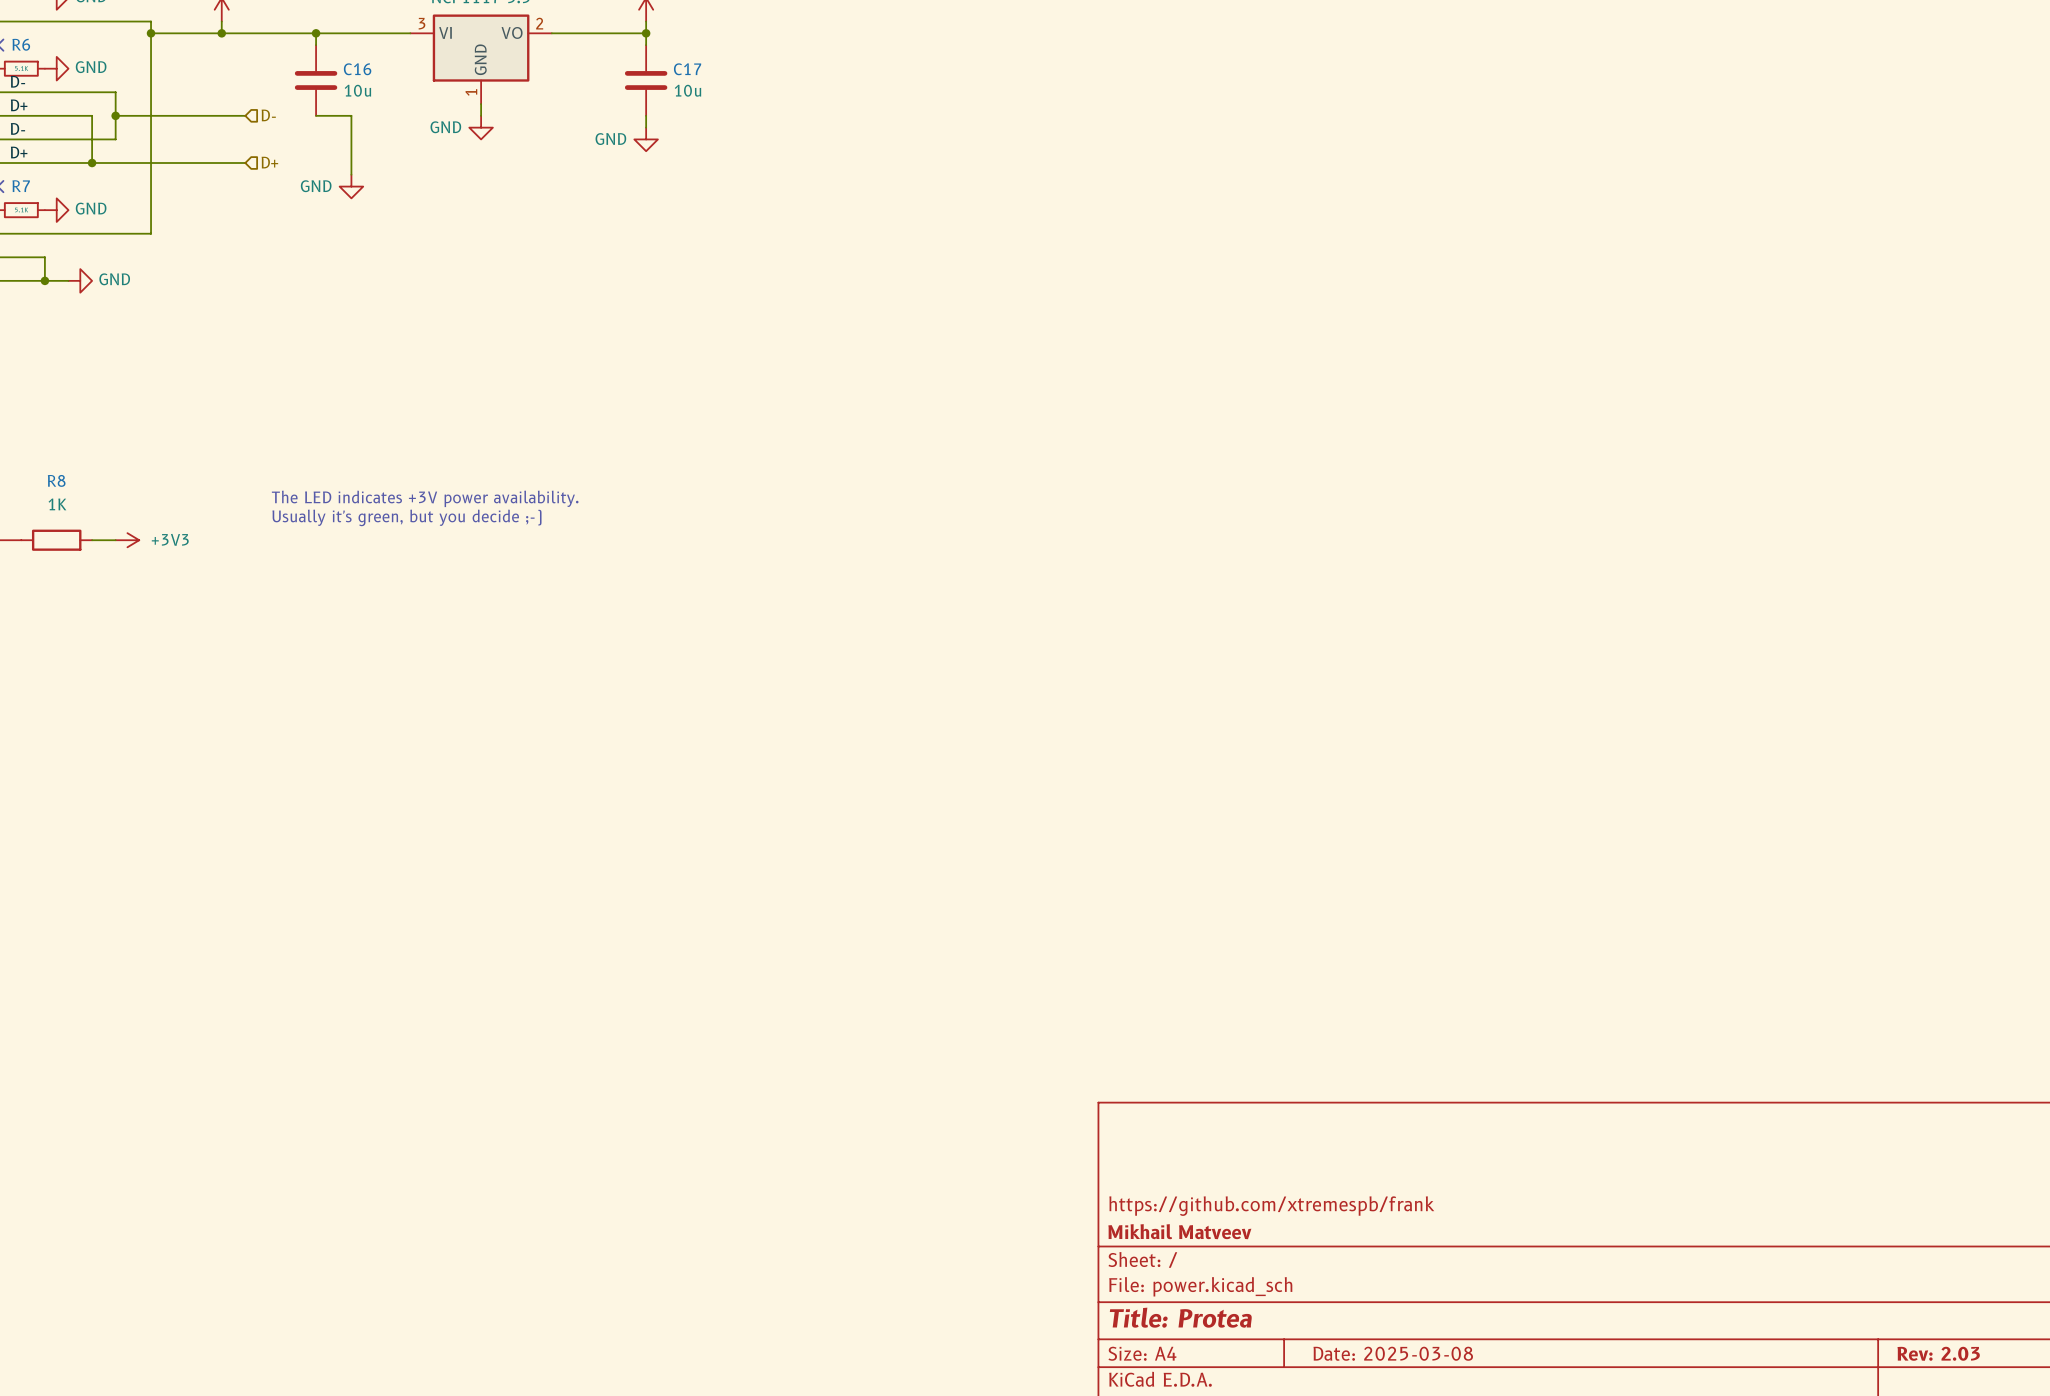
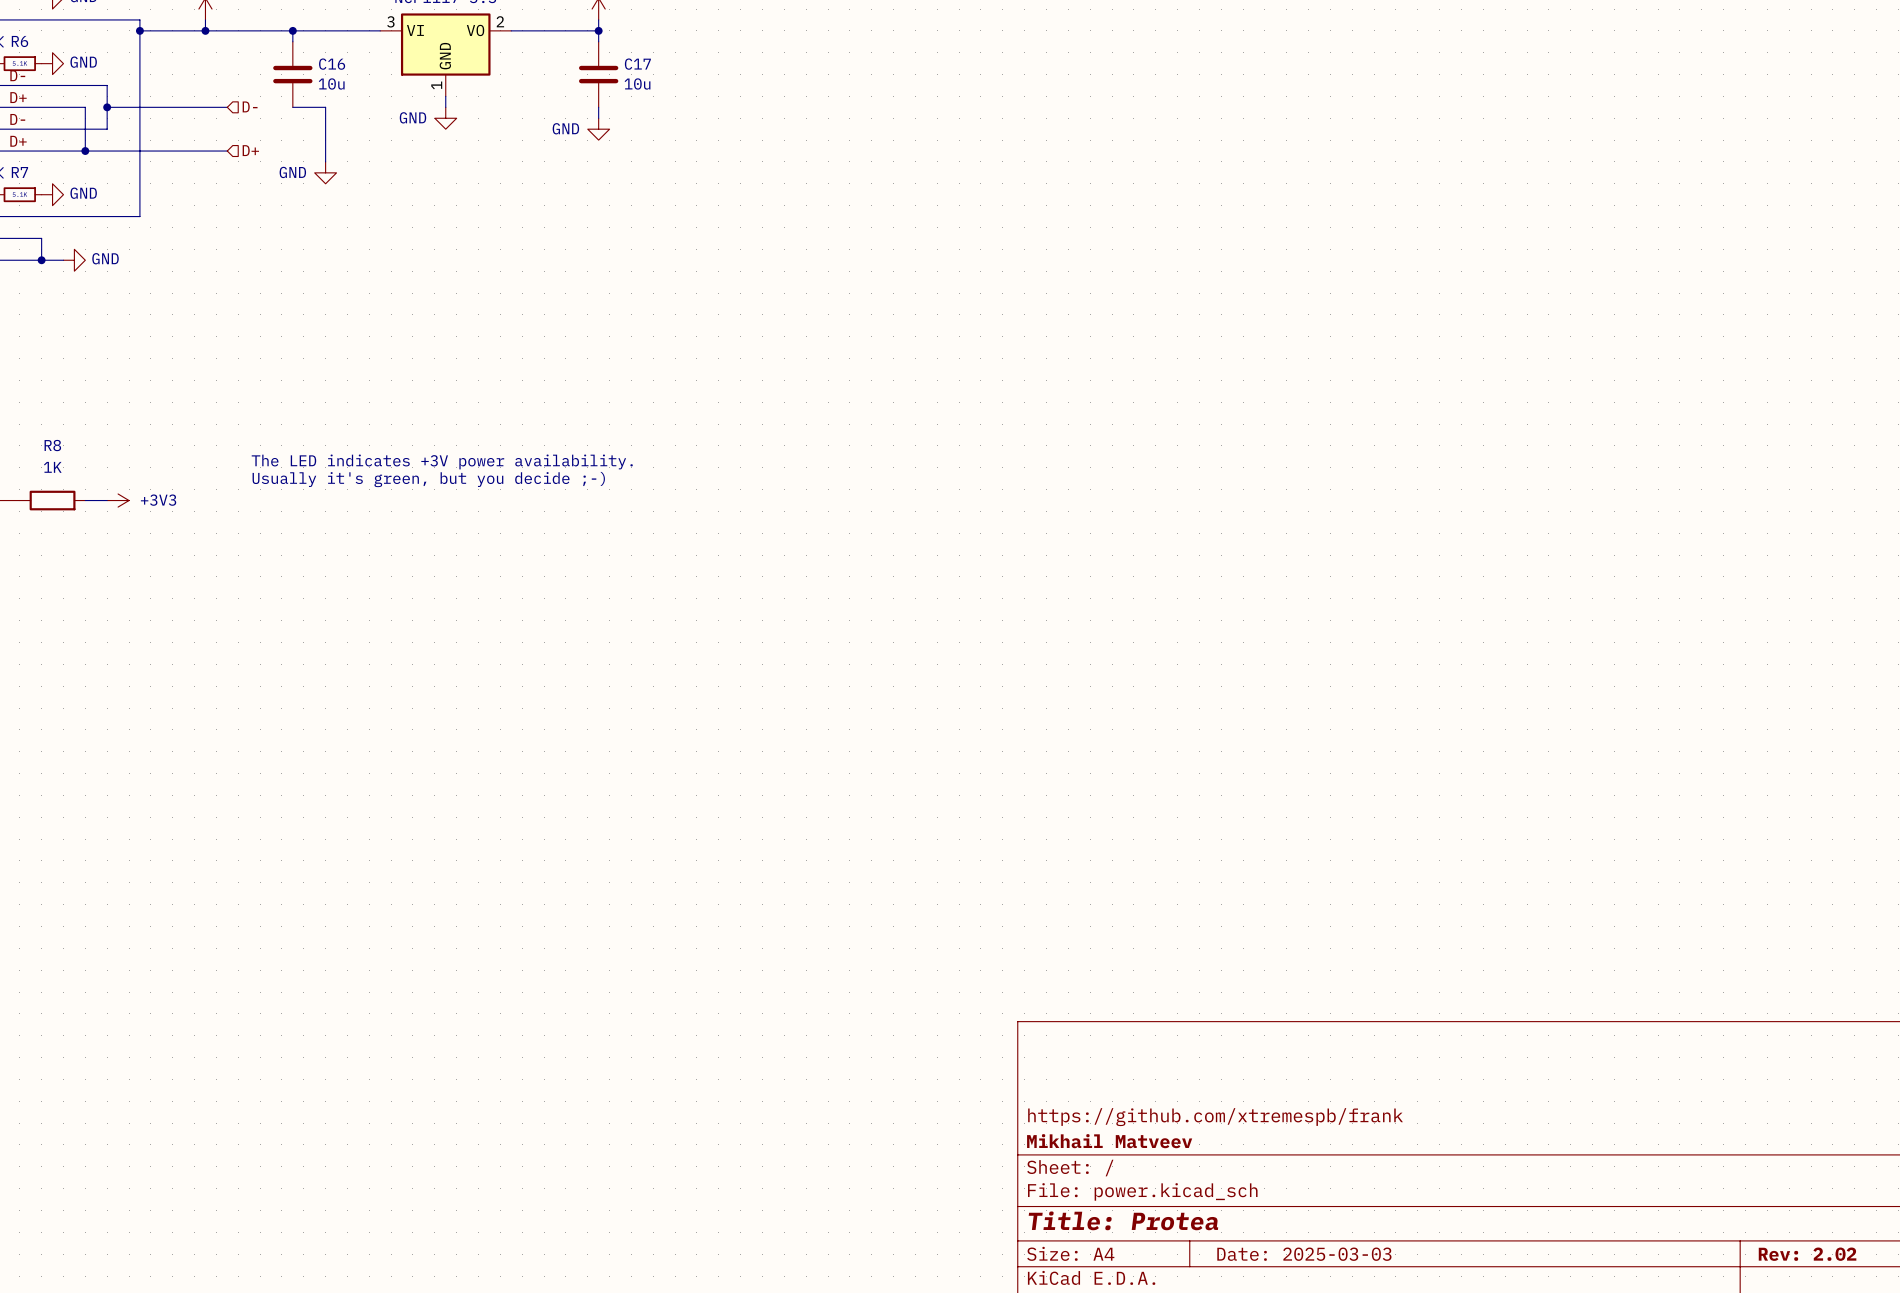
title block: Date: 2025-03-08 (1393, 1353) -> Date: 2025-03-03 (1304, 1254)
title block: Rev: 2.03 (1938, 1353) -> Rev: 2.02 (1807, 1254)

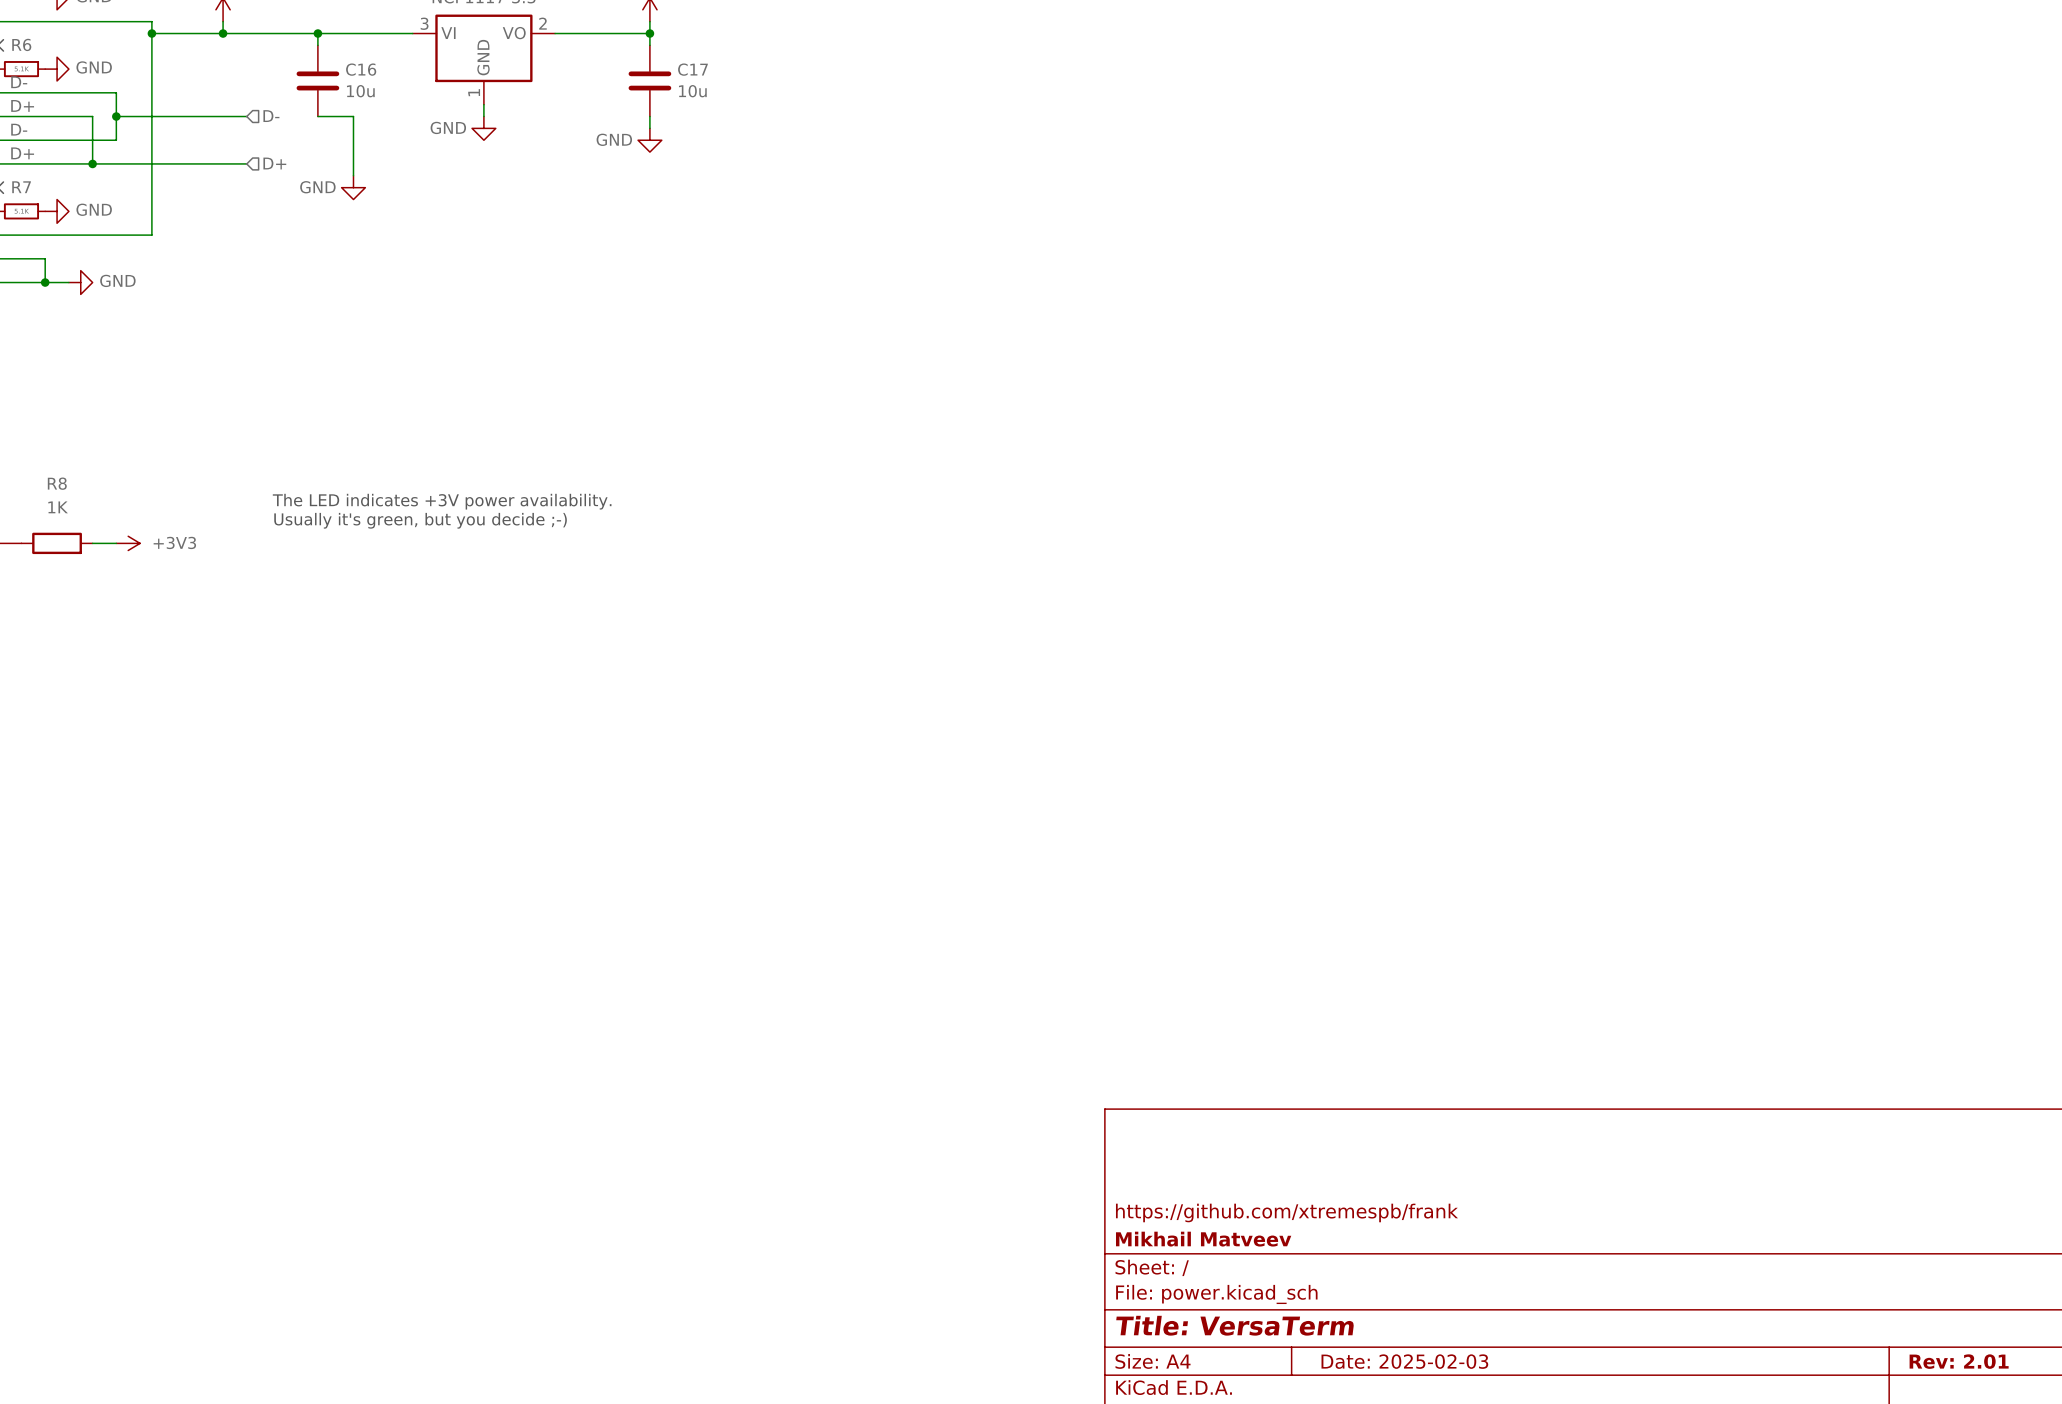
title block: Title: Protea (1123, 1220) -> Title: VersaTerm (1235, 1325)
title block: Date: 2025-03-03 (1304, 1254) -> Date: 2025-02-03 (1404, 1361)
title block: Rev: 2.02 (1807, 1254) -> Rev: 2.01 (1959, 1361)

